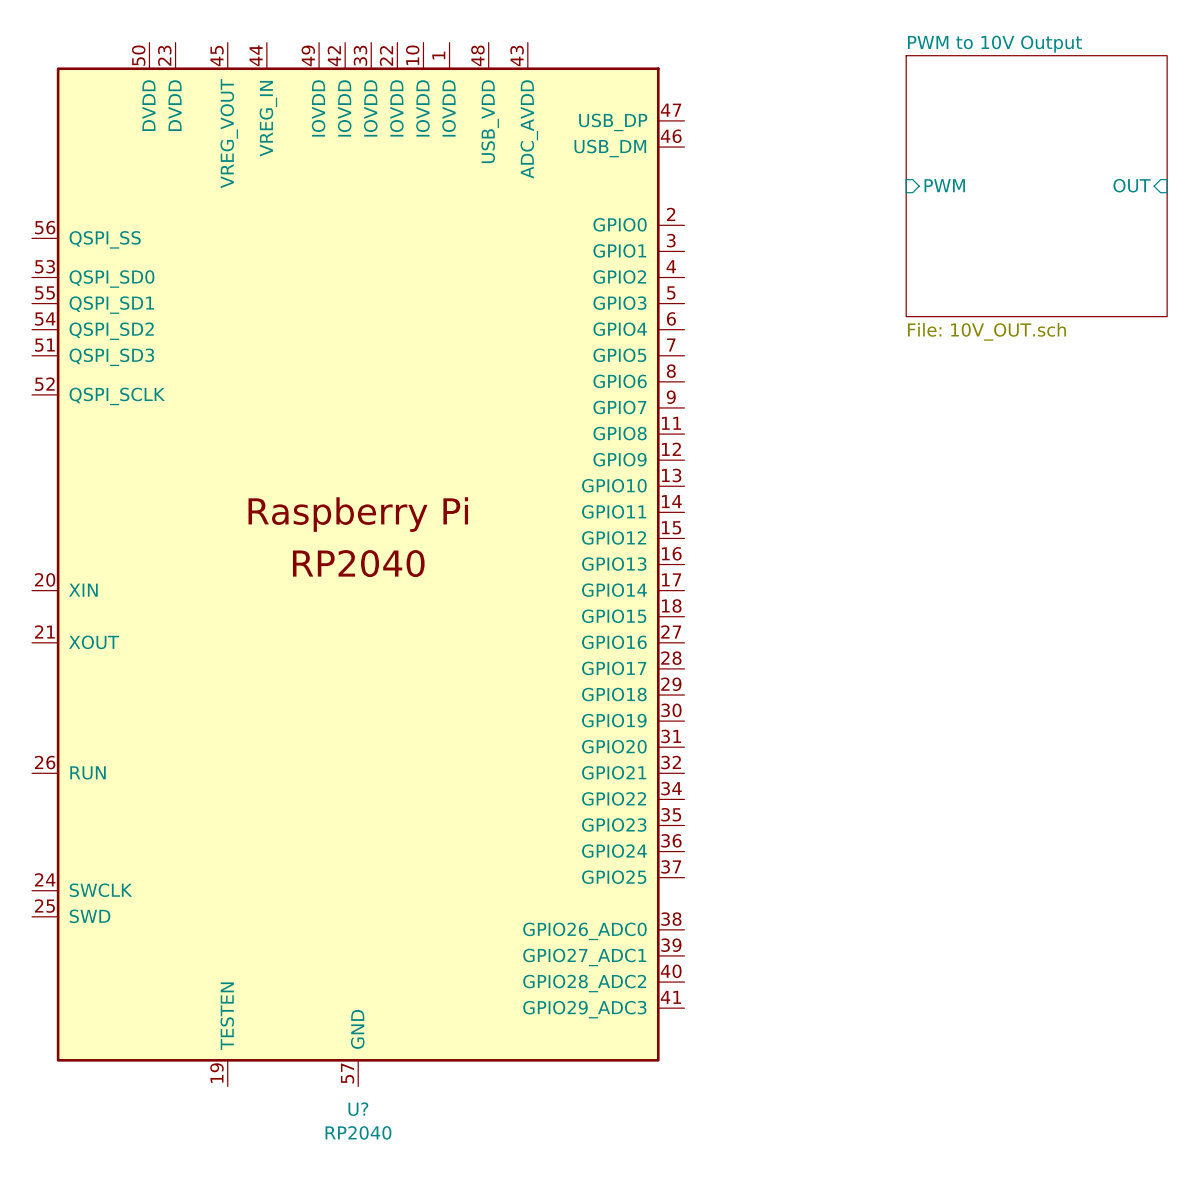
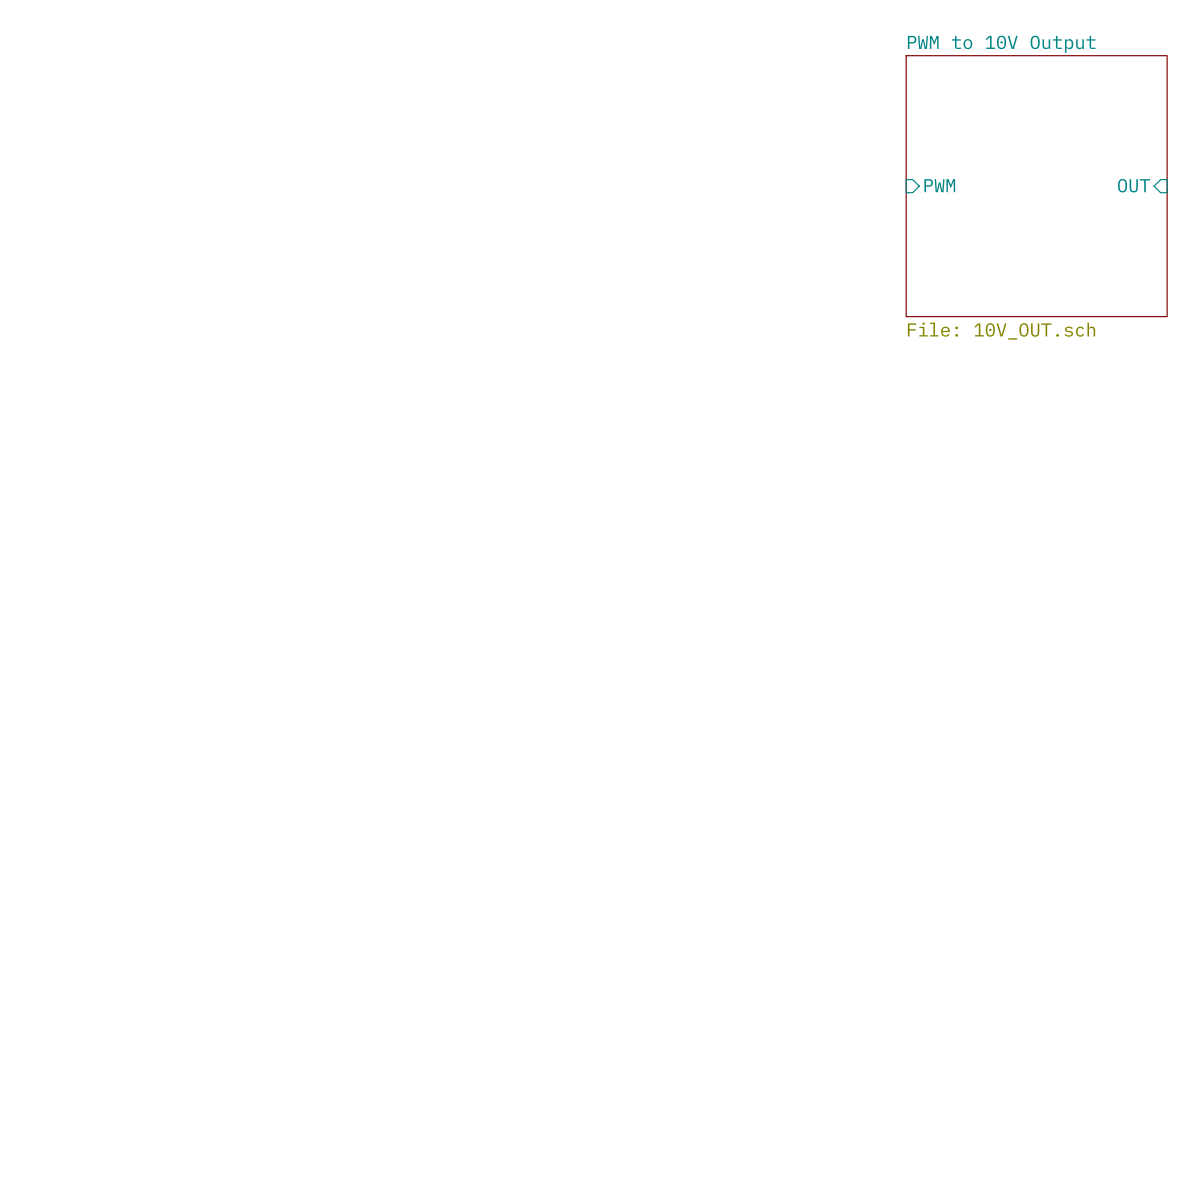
U?: RP2040 (358, 564) -> none

